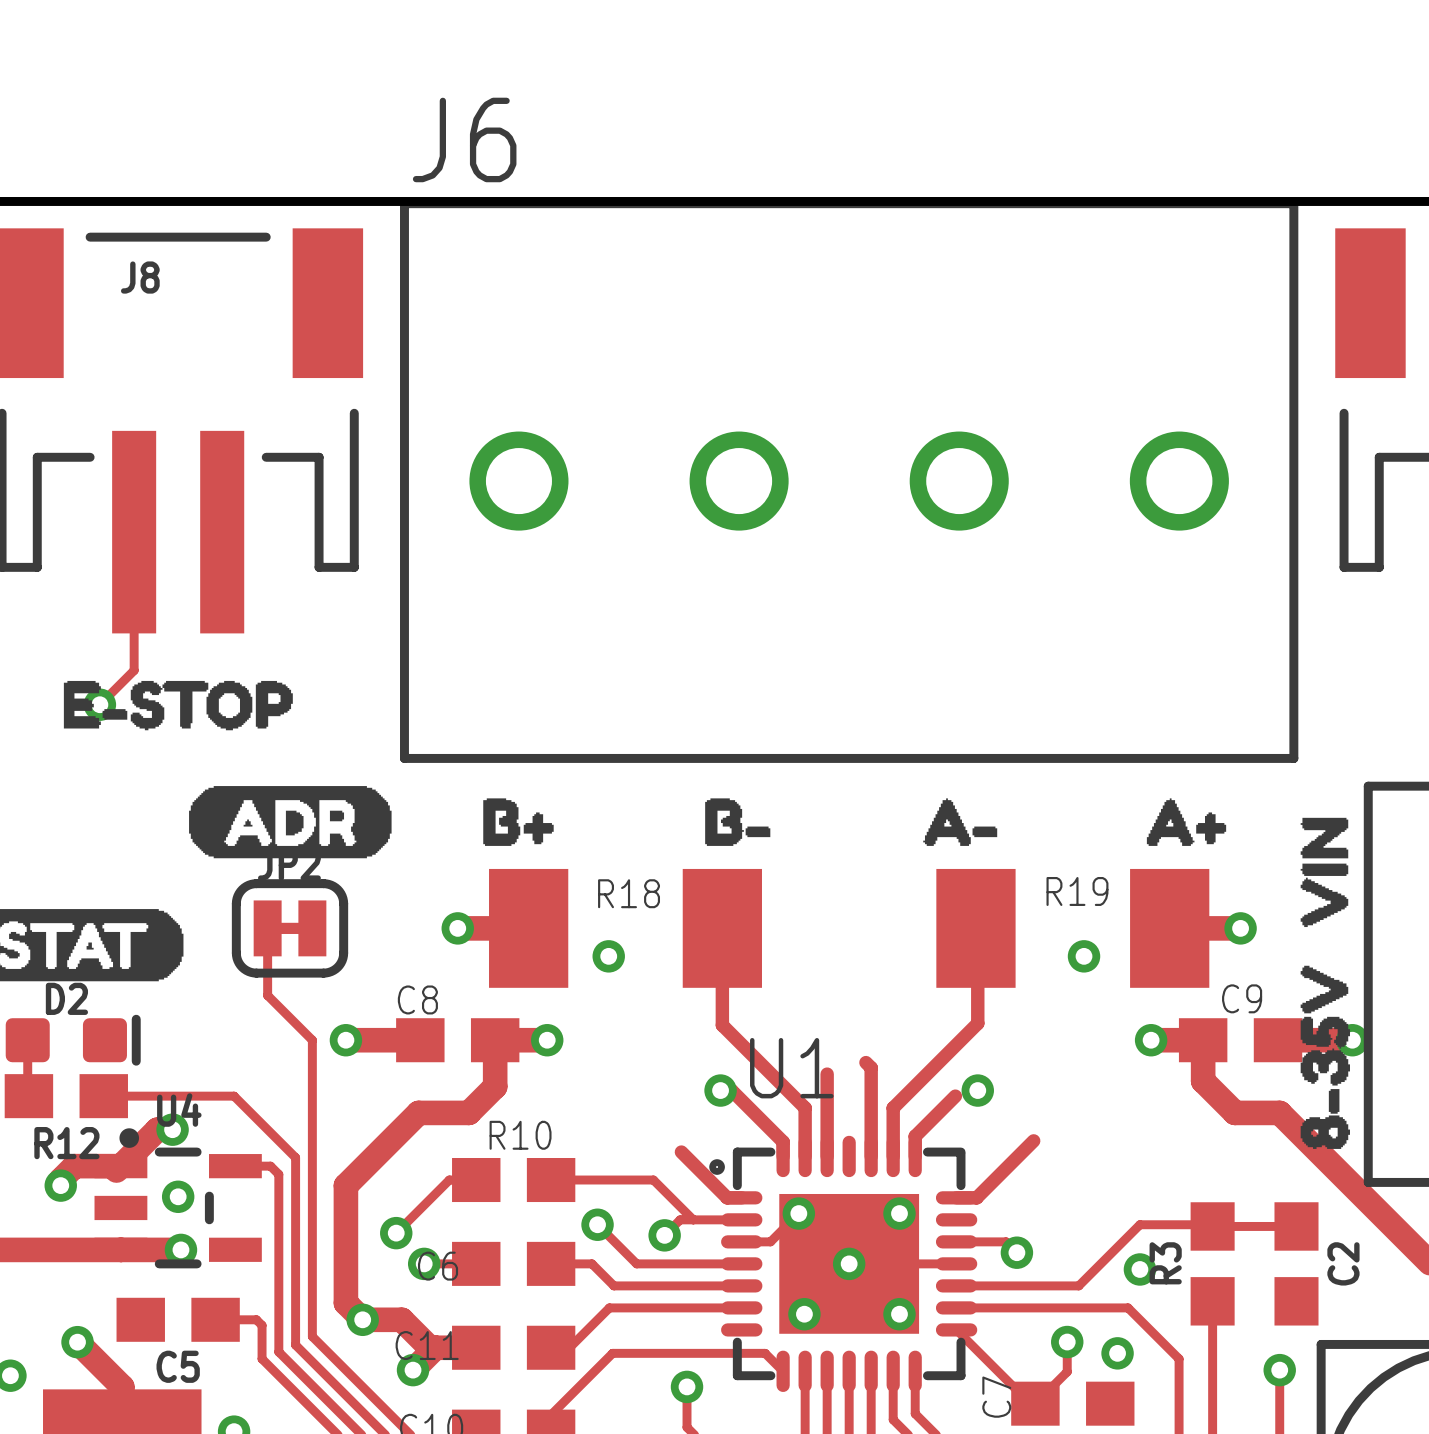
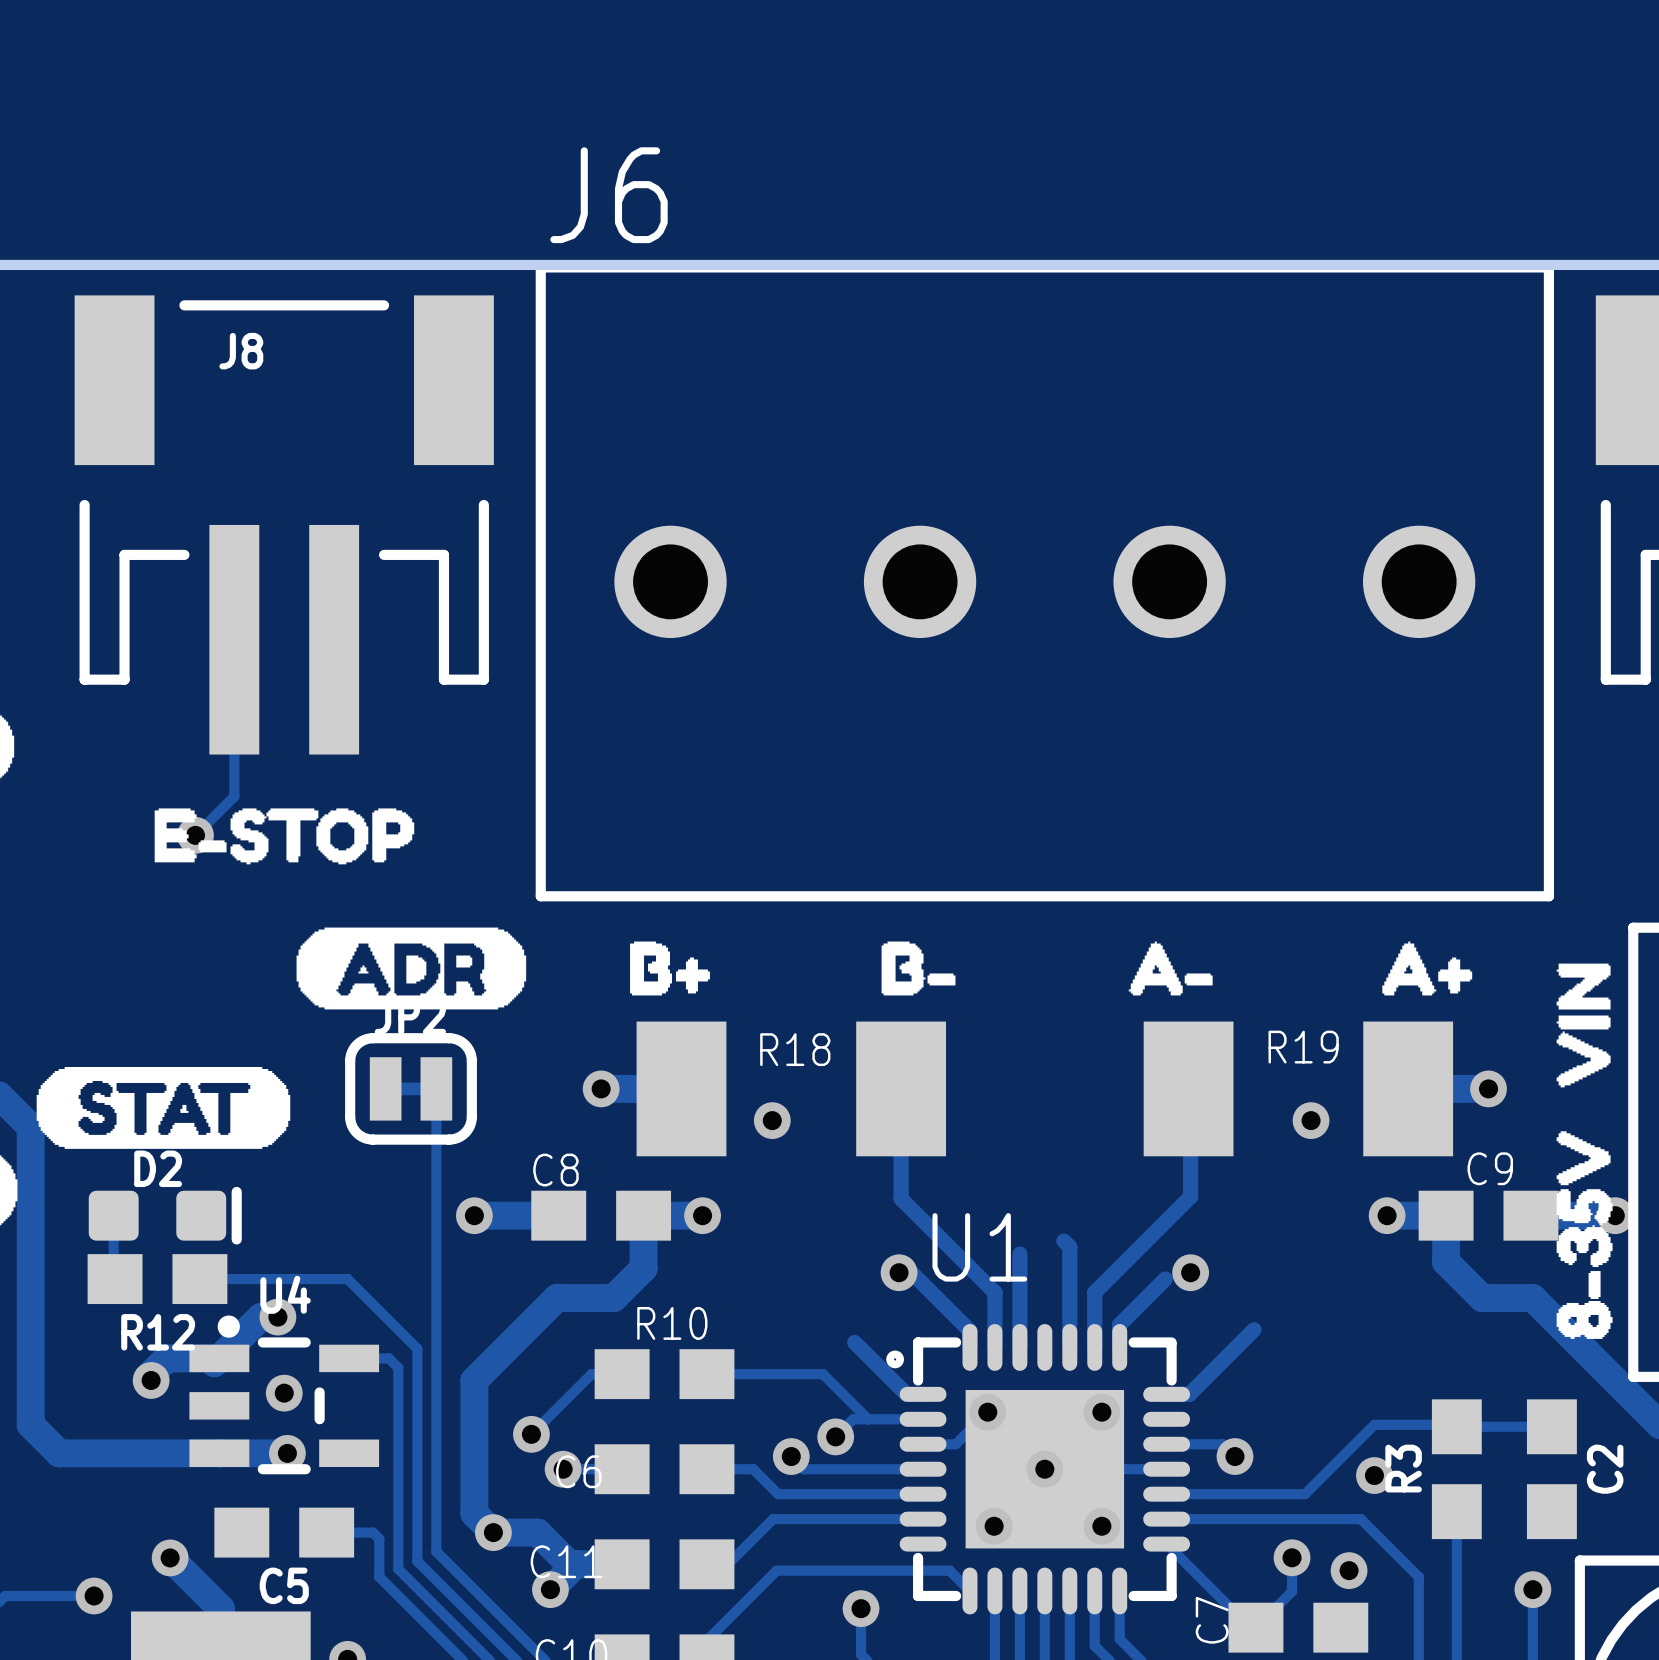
track: (267, 928) (267, 995) (312, 1040) -> (436, 1088) (436, 1215)
track: (597, 1224) (625, 1252) -> none
via position: (597, 1224) -> (791, 1456)

